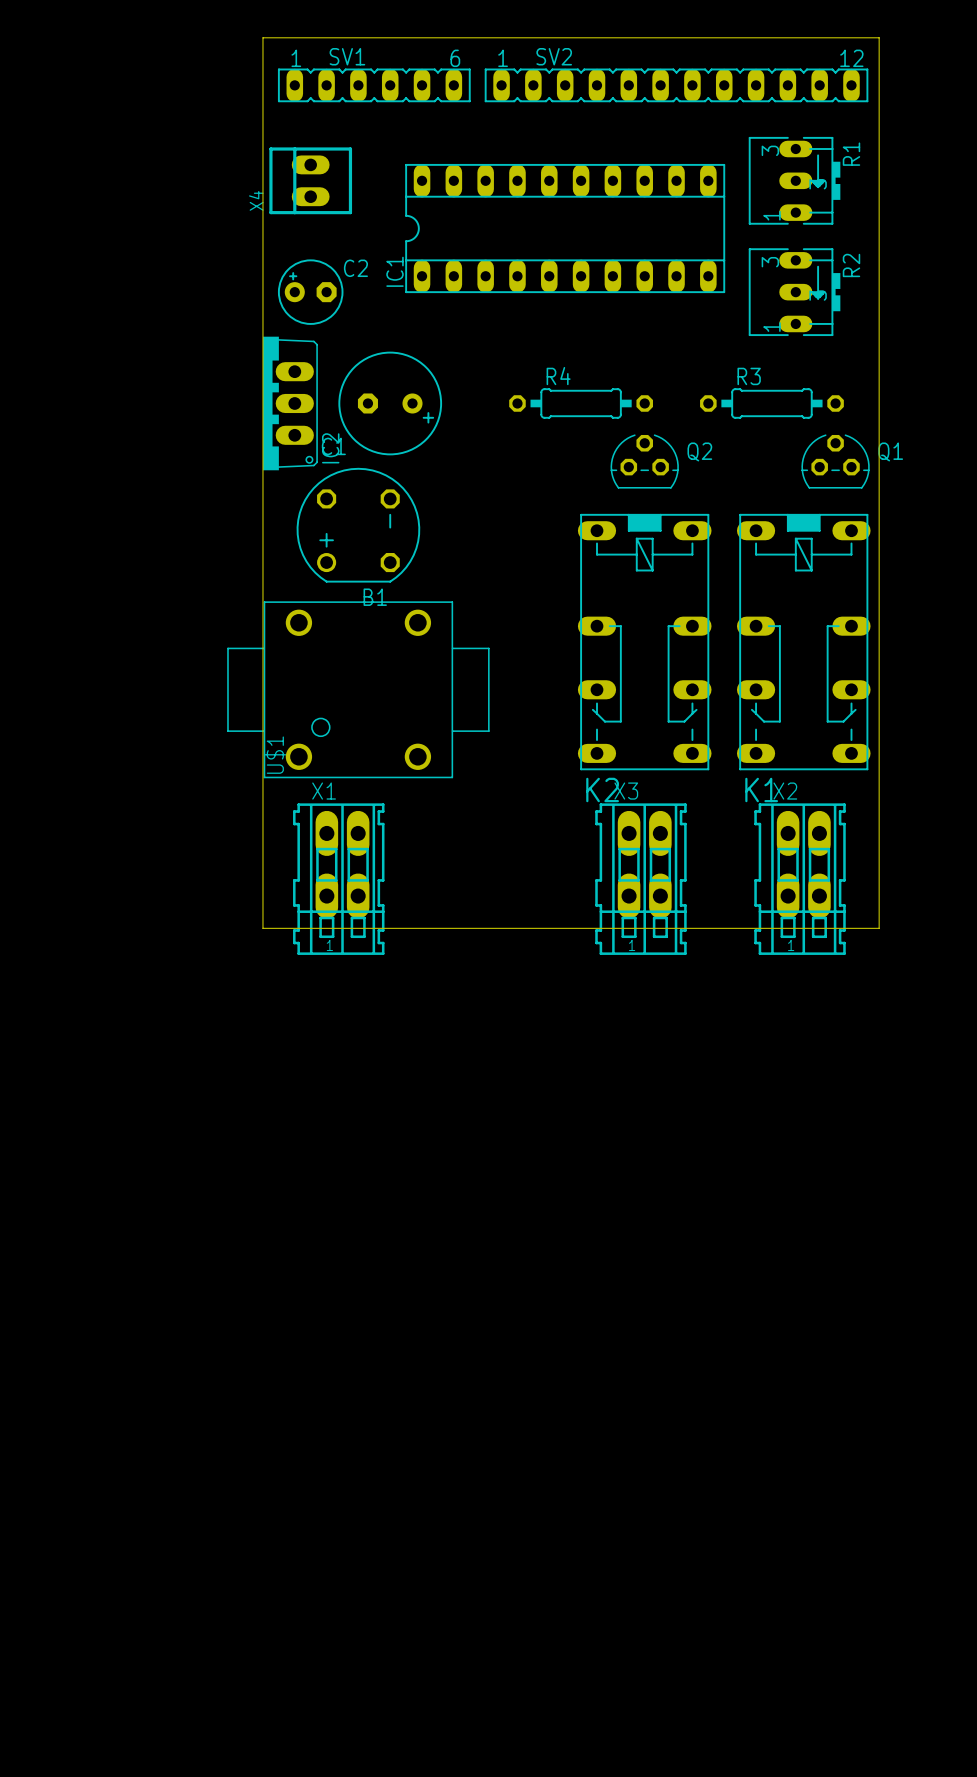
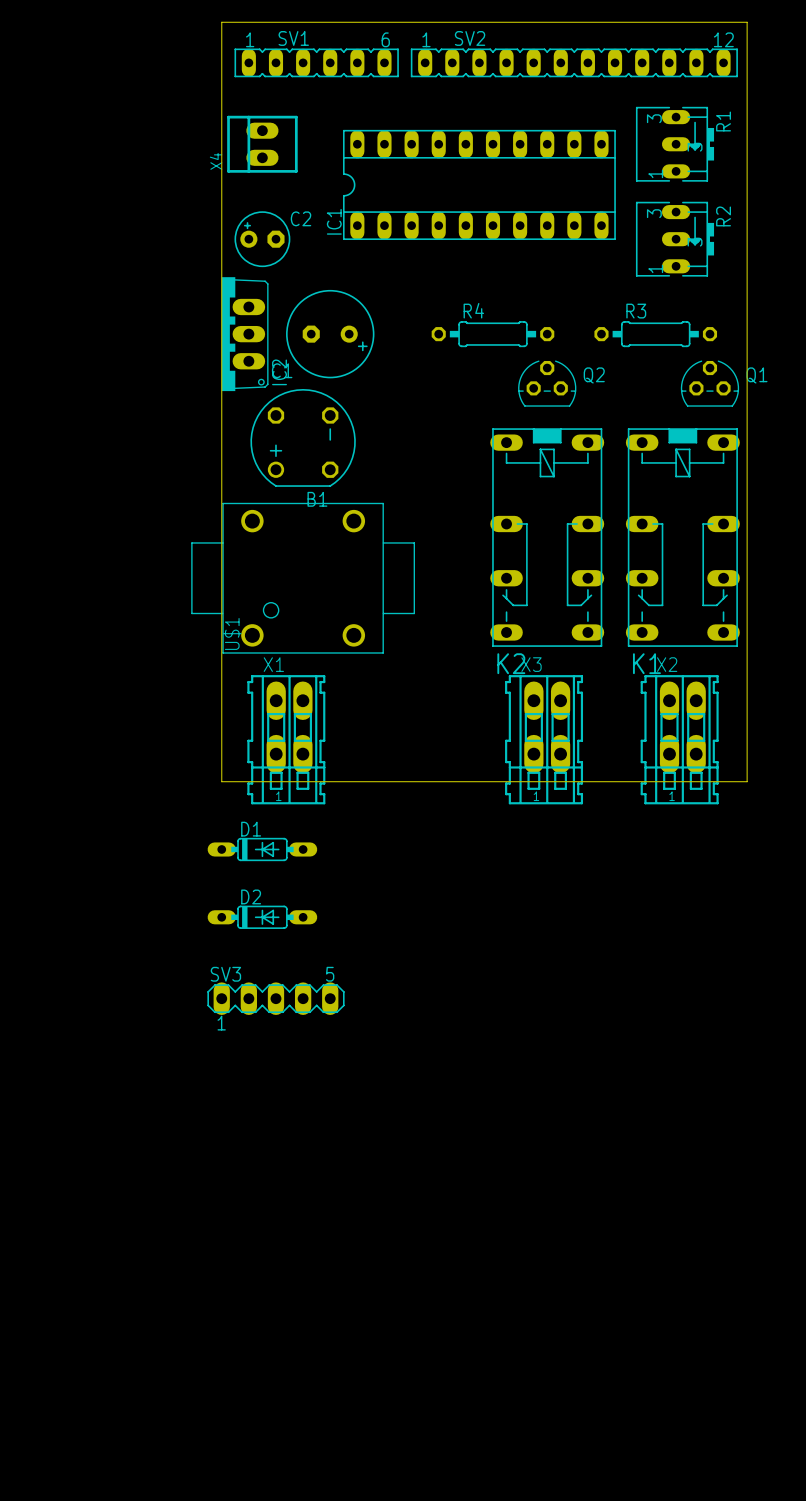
D1: none -> (262, 849)
D2: none -> (262, 917)
SV3: none -> (275, 998)

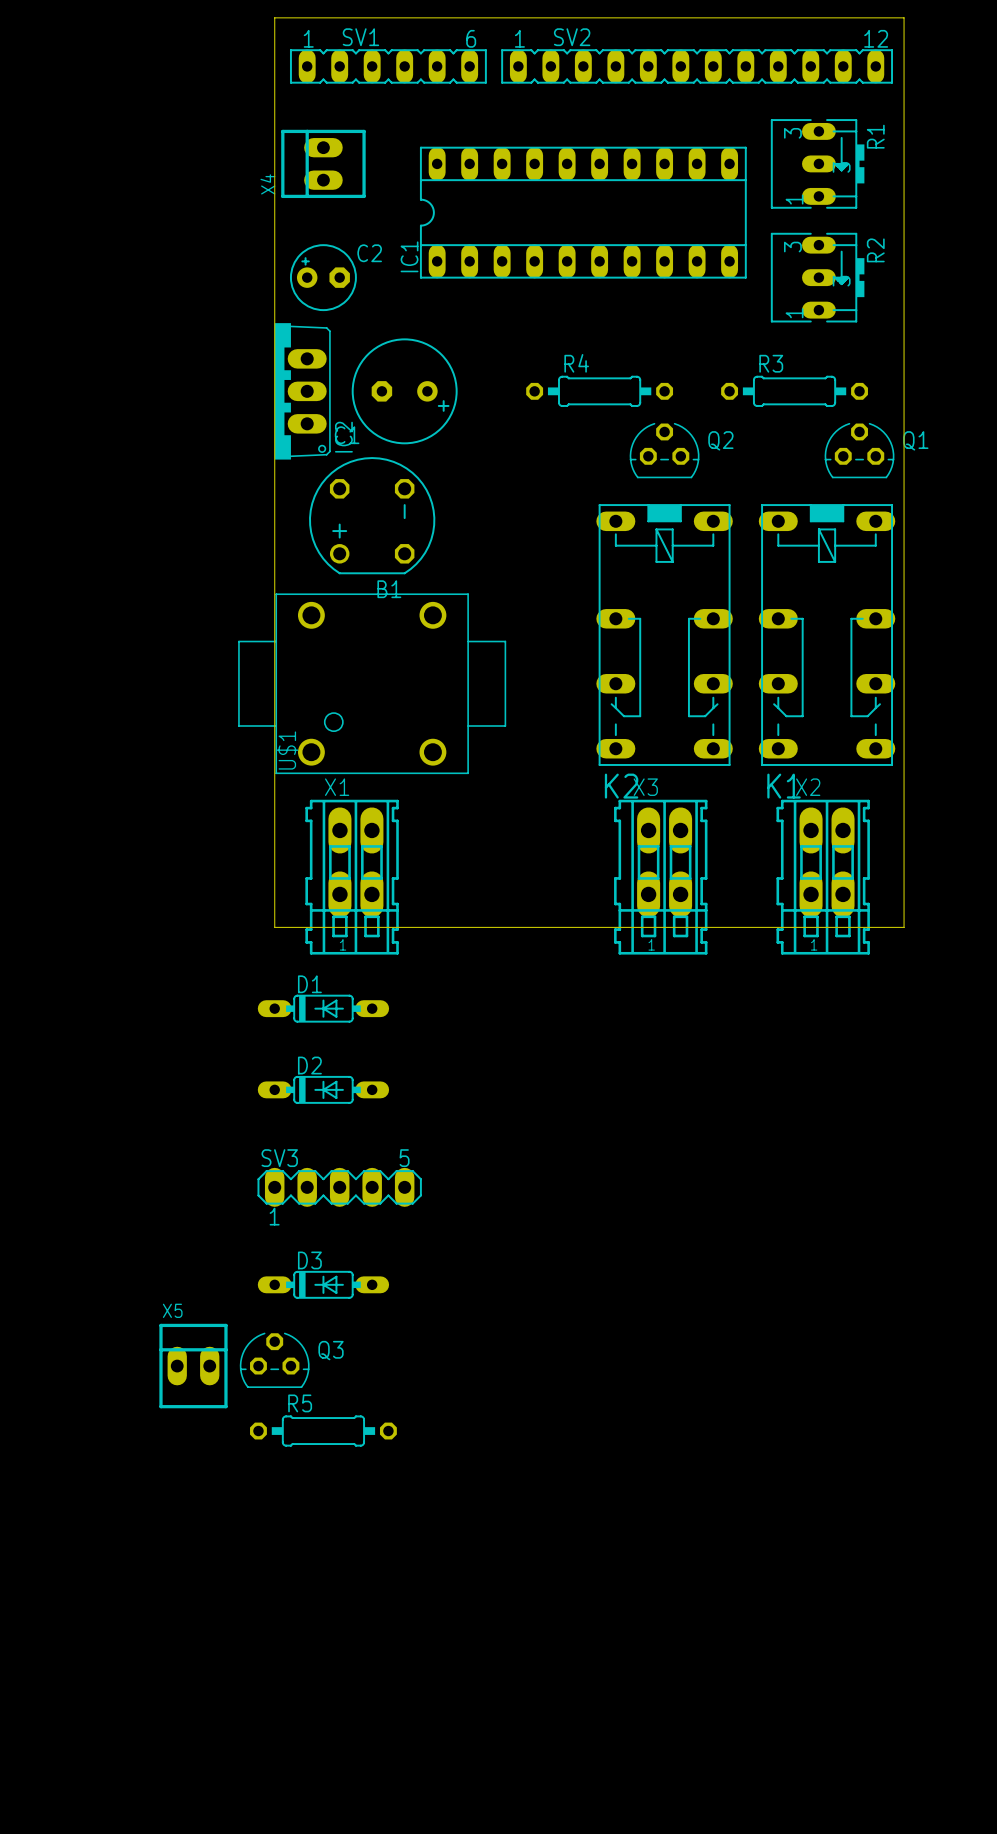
D3: none -> (323, 1284)
Q3: none -> (274, 1360)
X5: none -> (193, 1366)
R5: none -> (323, 1431)

